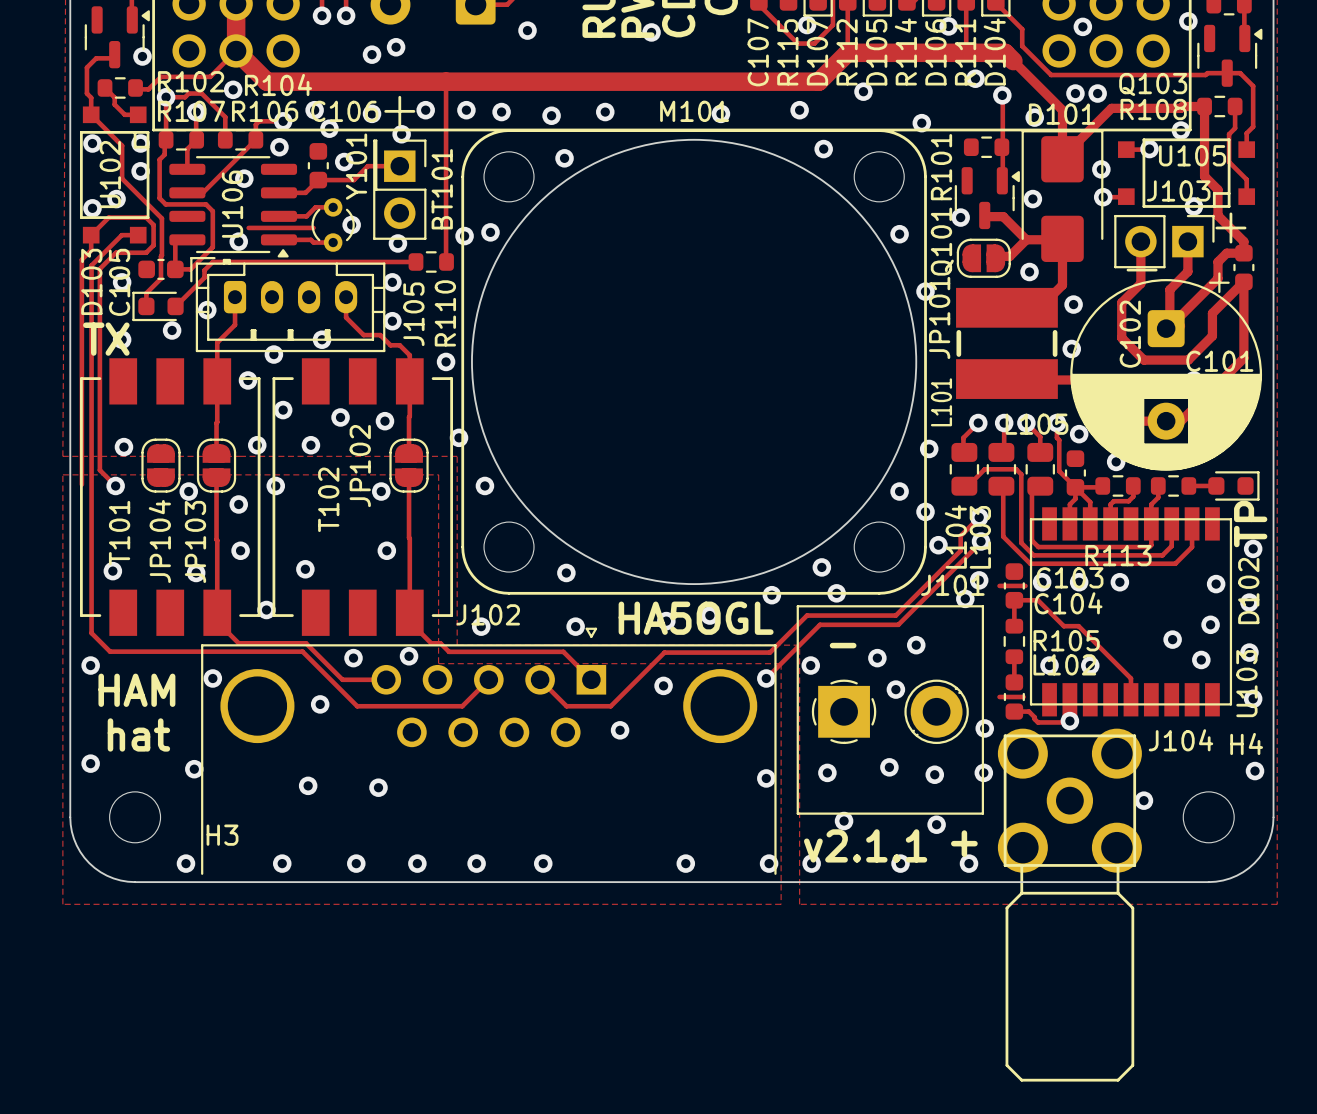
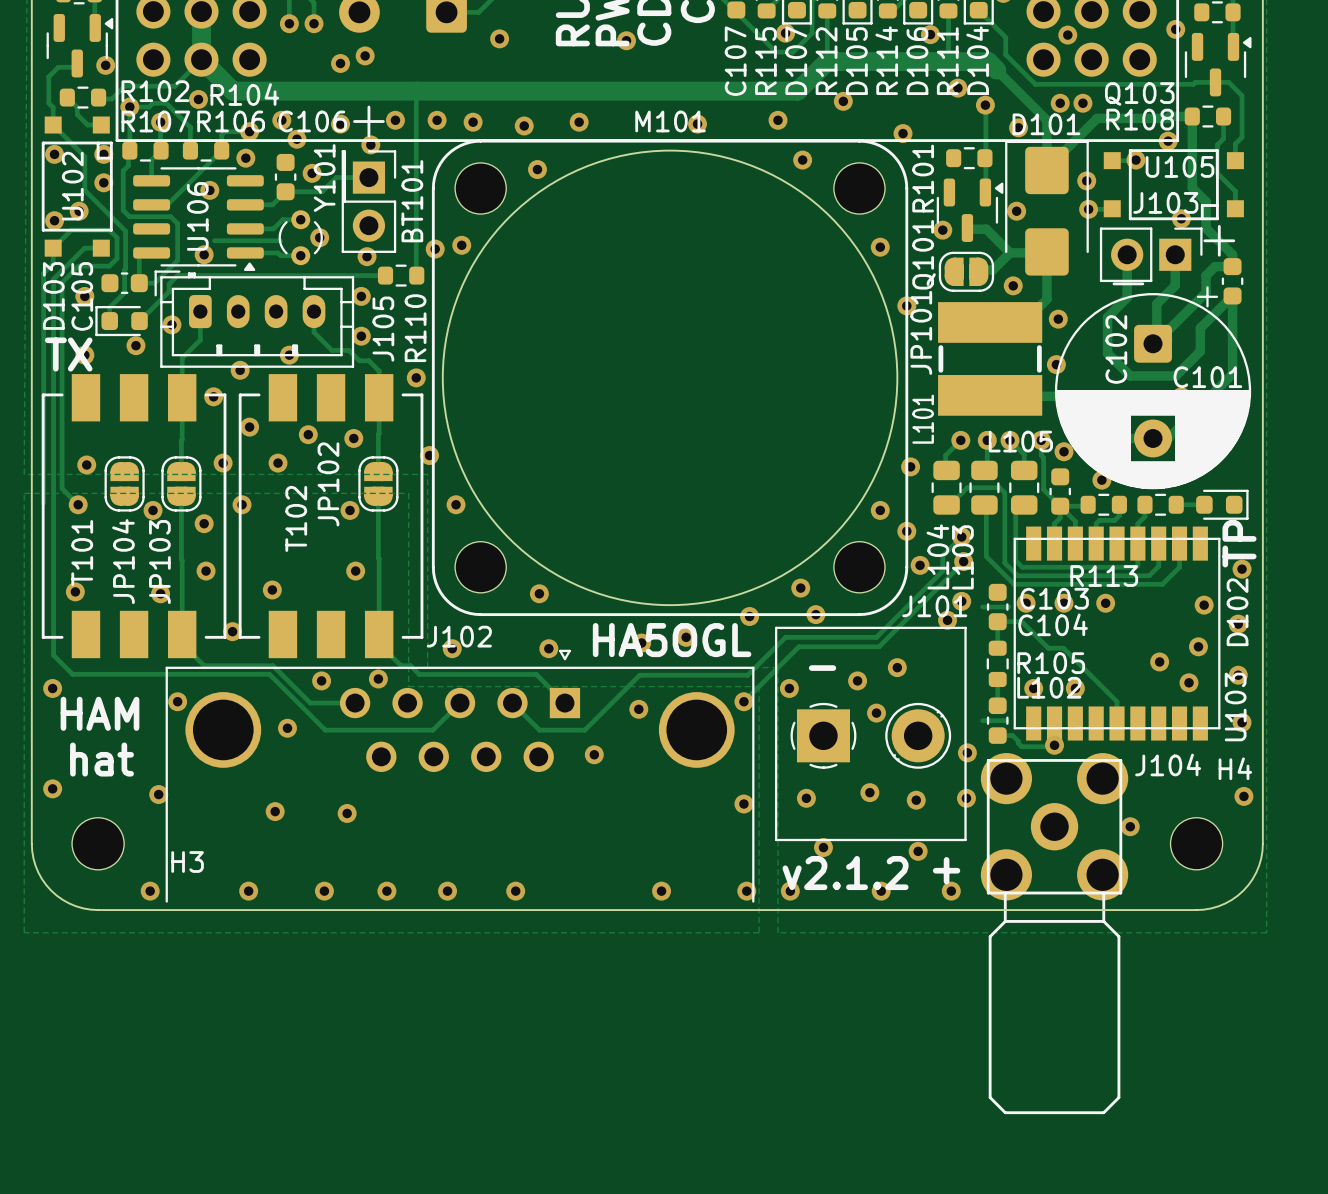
text: v2.1.1 (865, 845) -> v2.1.2 (845, 873)

